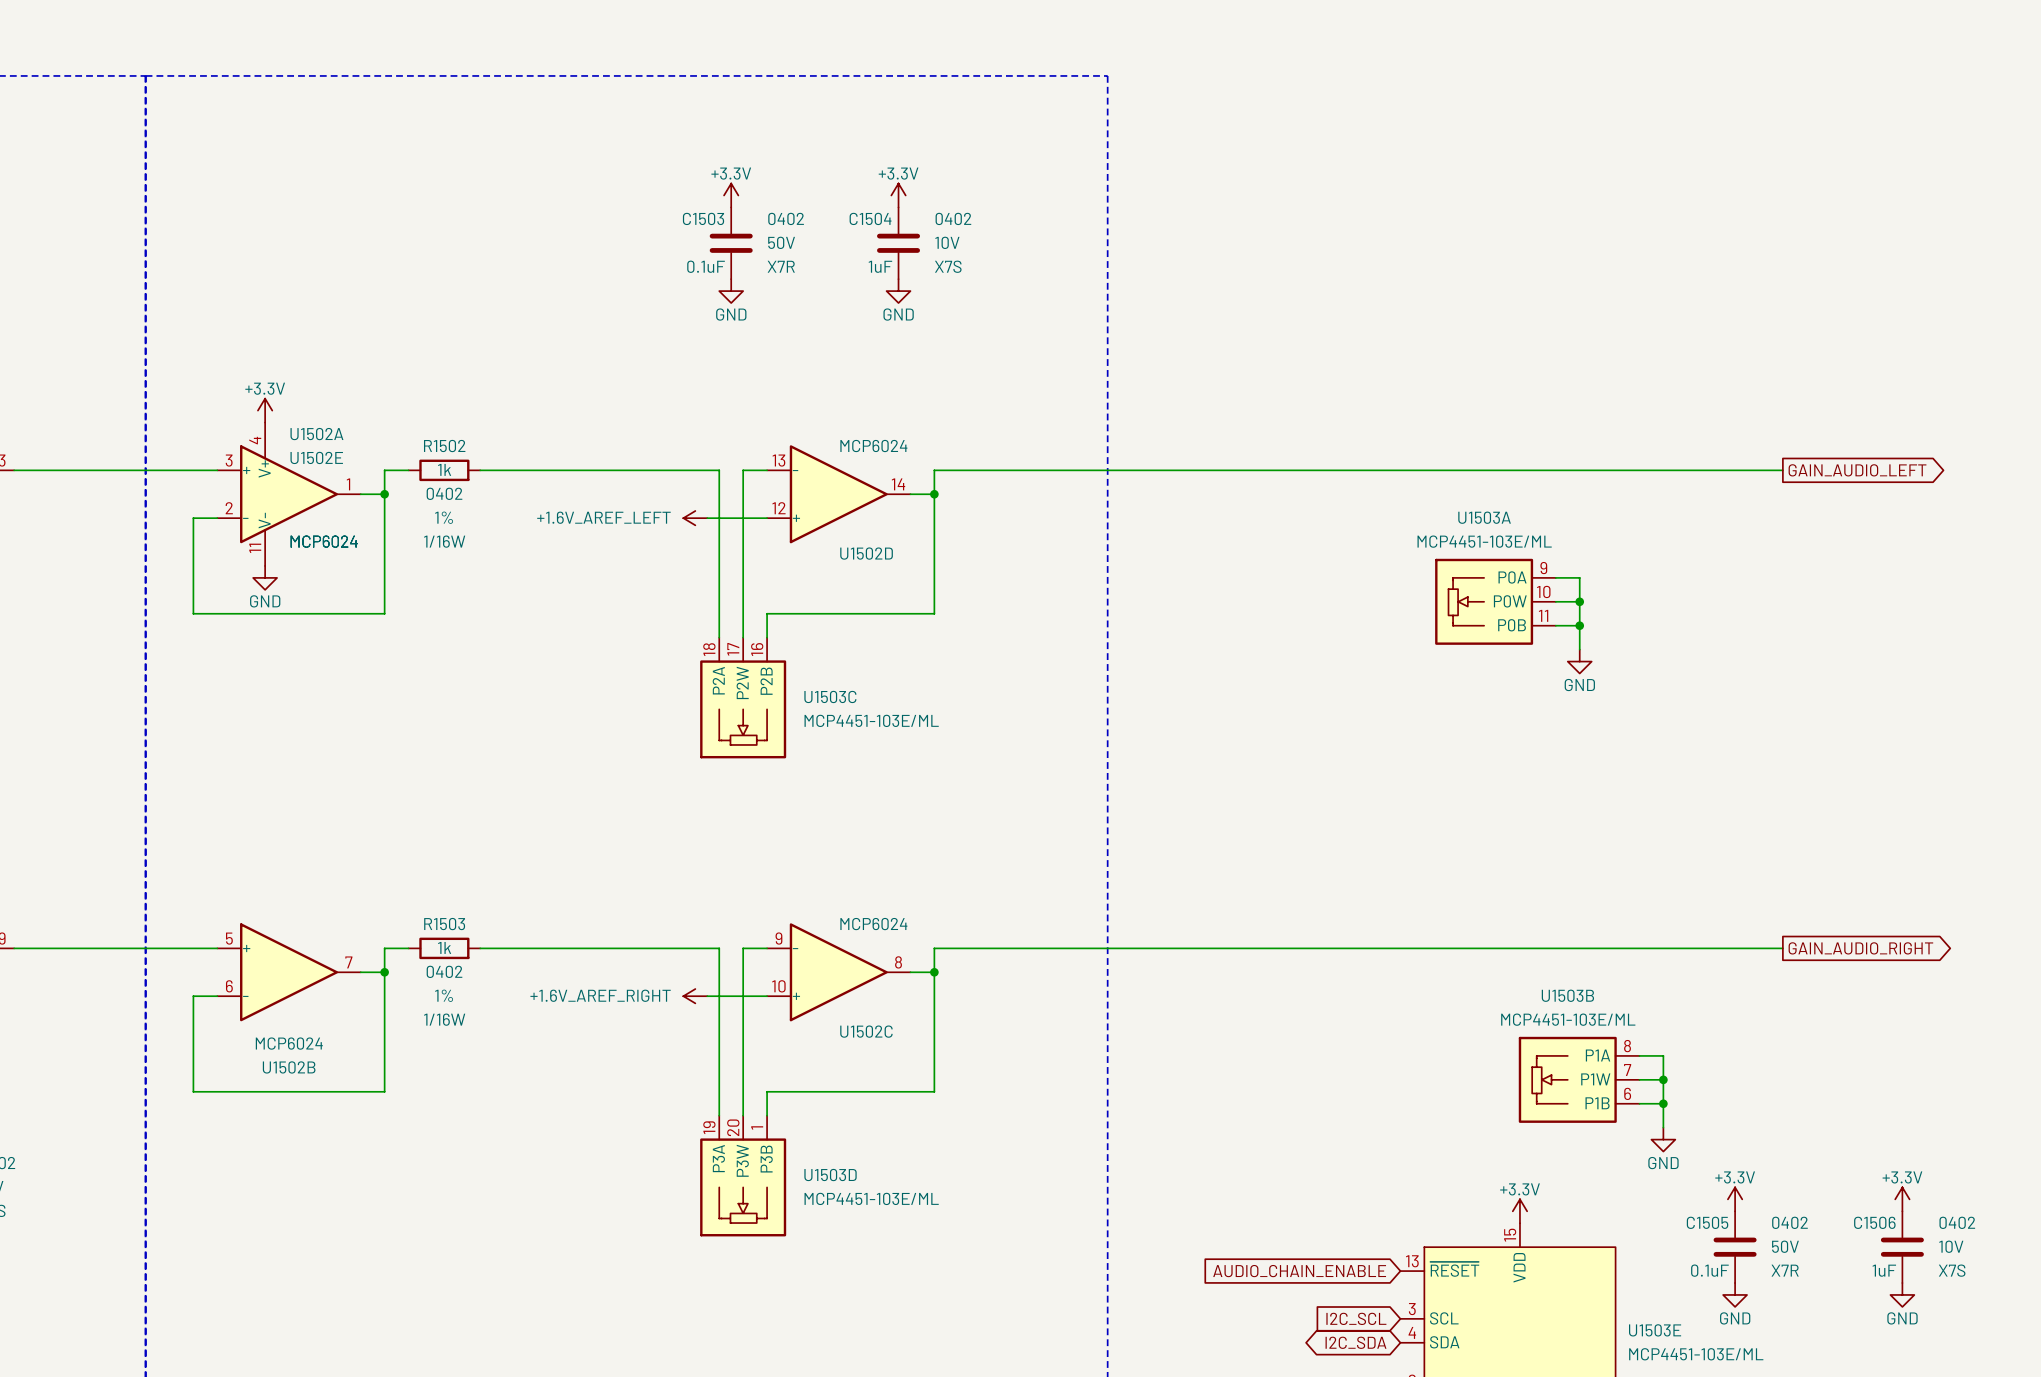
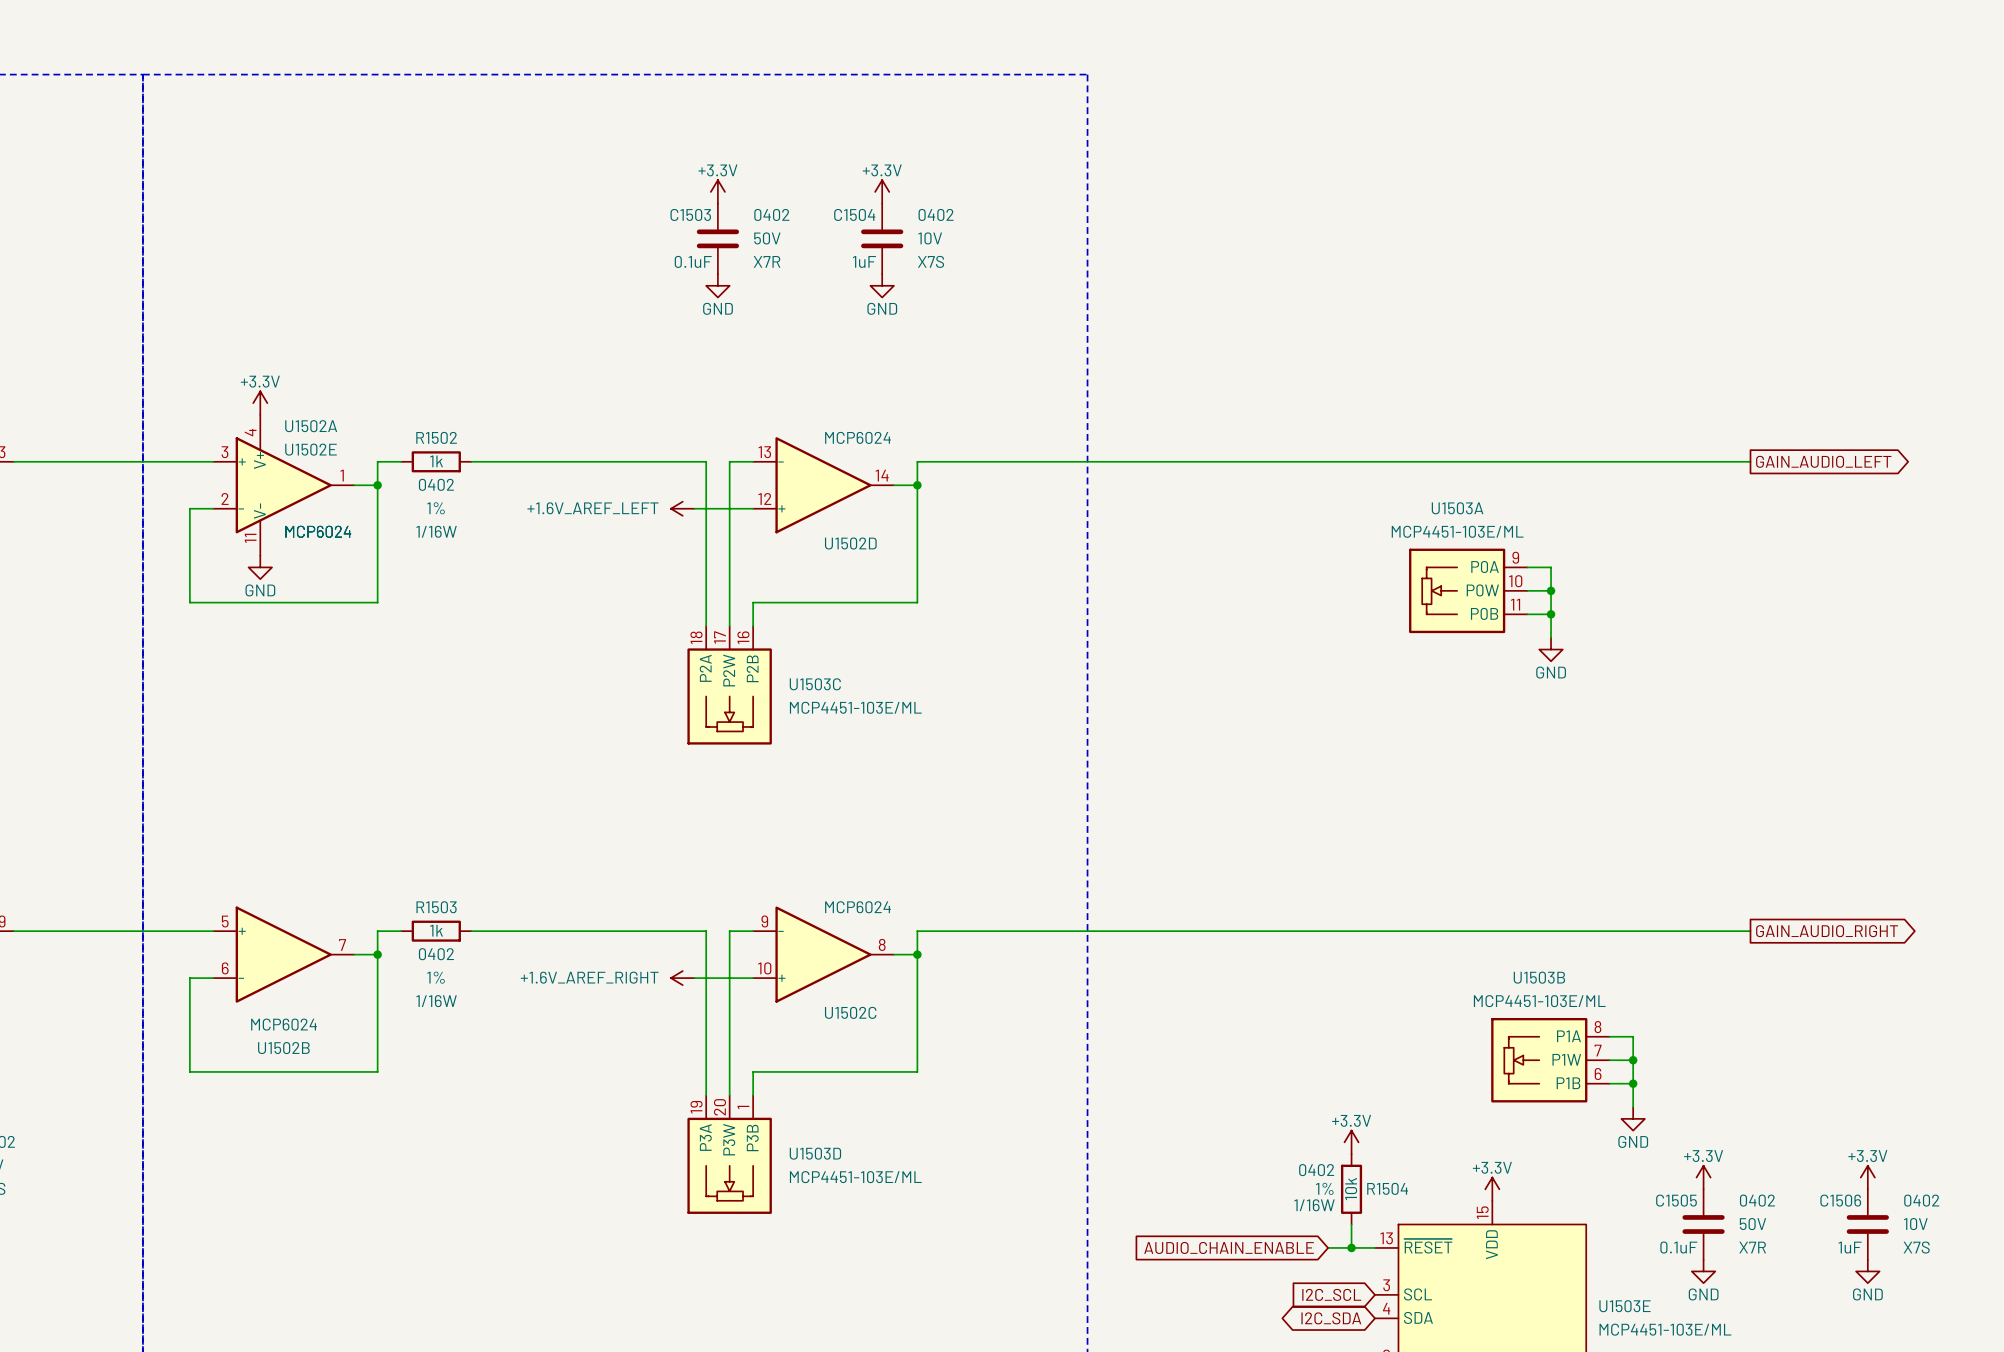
power symbol: none -> +3.3V (1351, 1142)
R1504: none -> 10k (1351, 1189)
wire: none -> (1351, 1224) (1351, 1247)
global label position: AUDIO_CHAIN_ENABLE (1299, 1271) -> AUDIO_CHAIN_ENABLE (1229, 1247)
wire: none -> (1328, 1247) (1375, 1247)
junction: none -> (1351, 1247)

